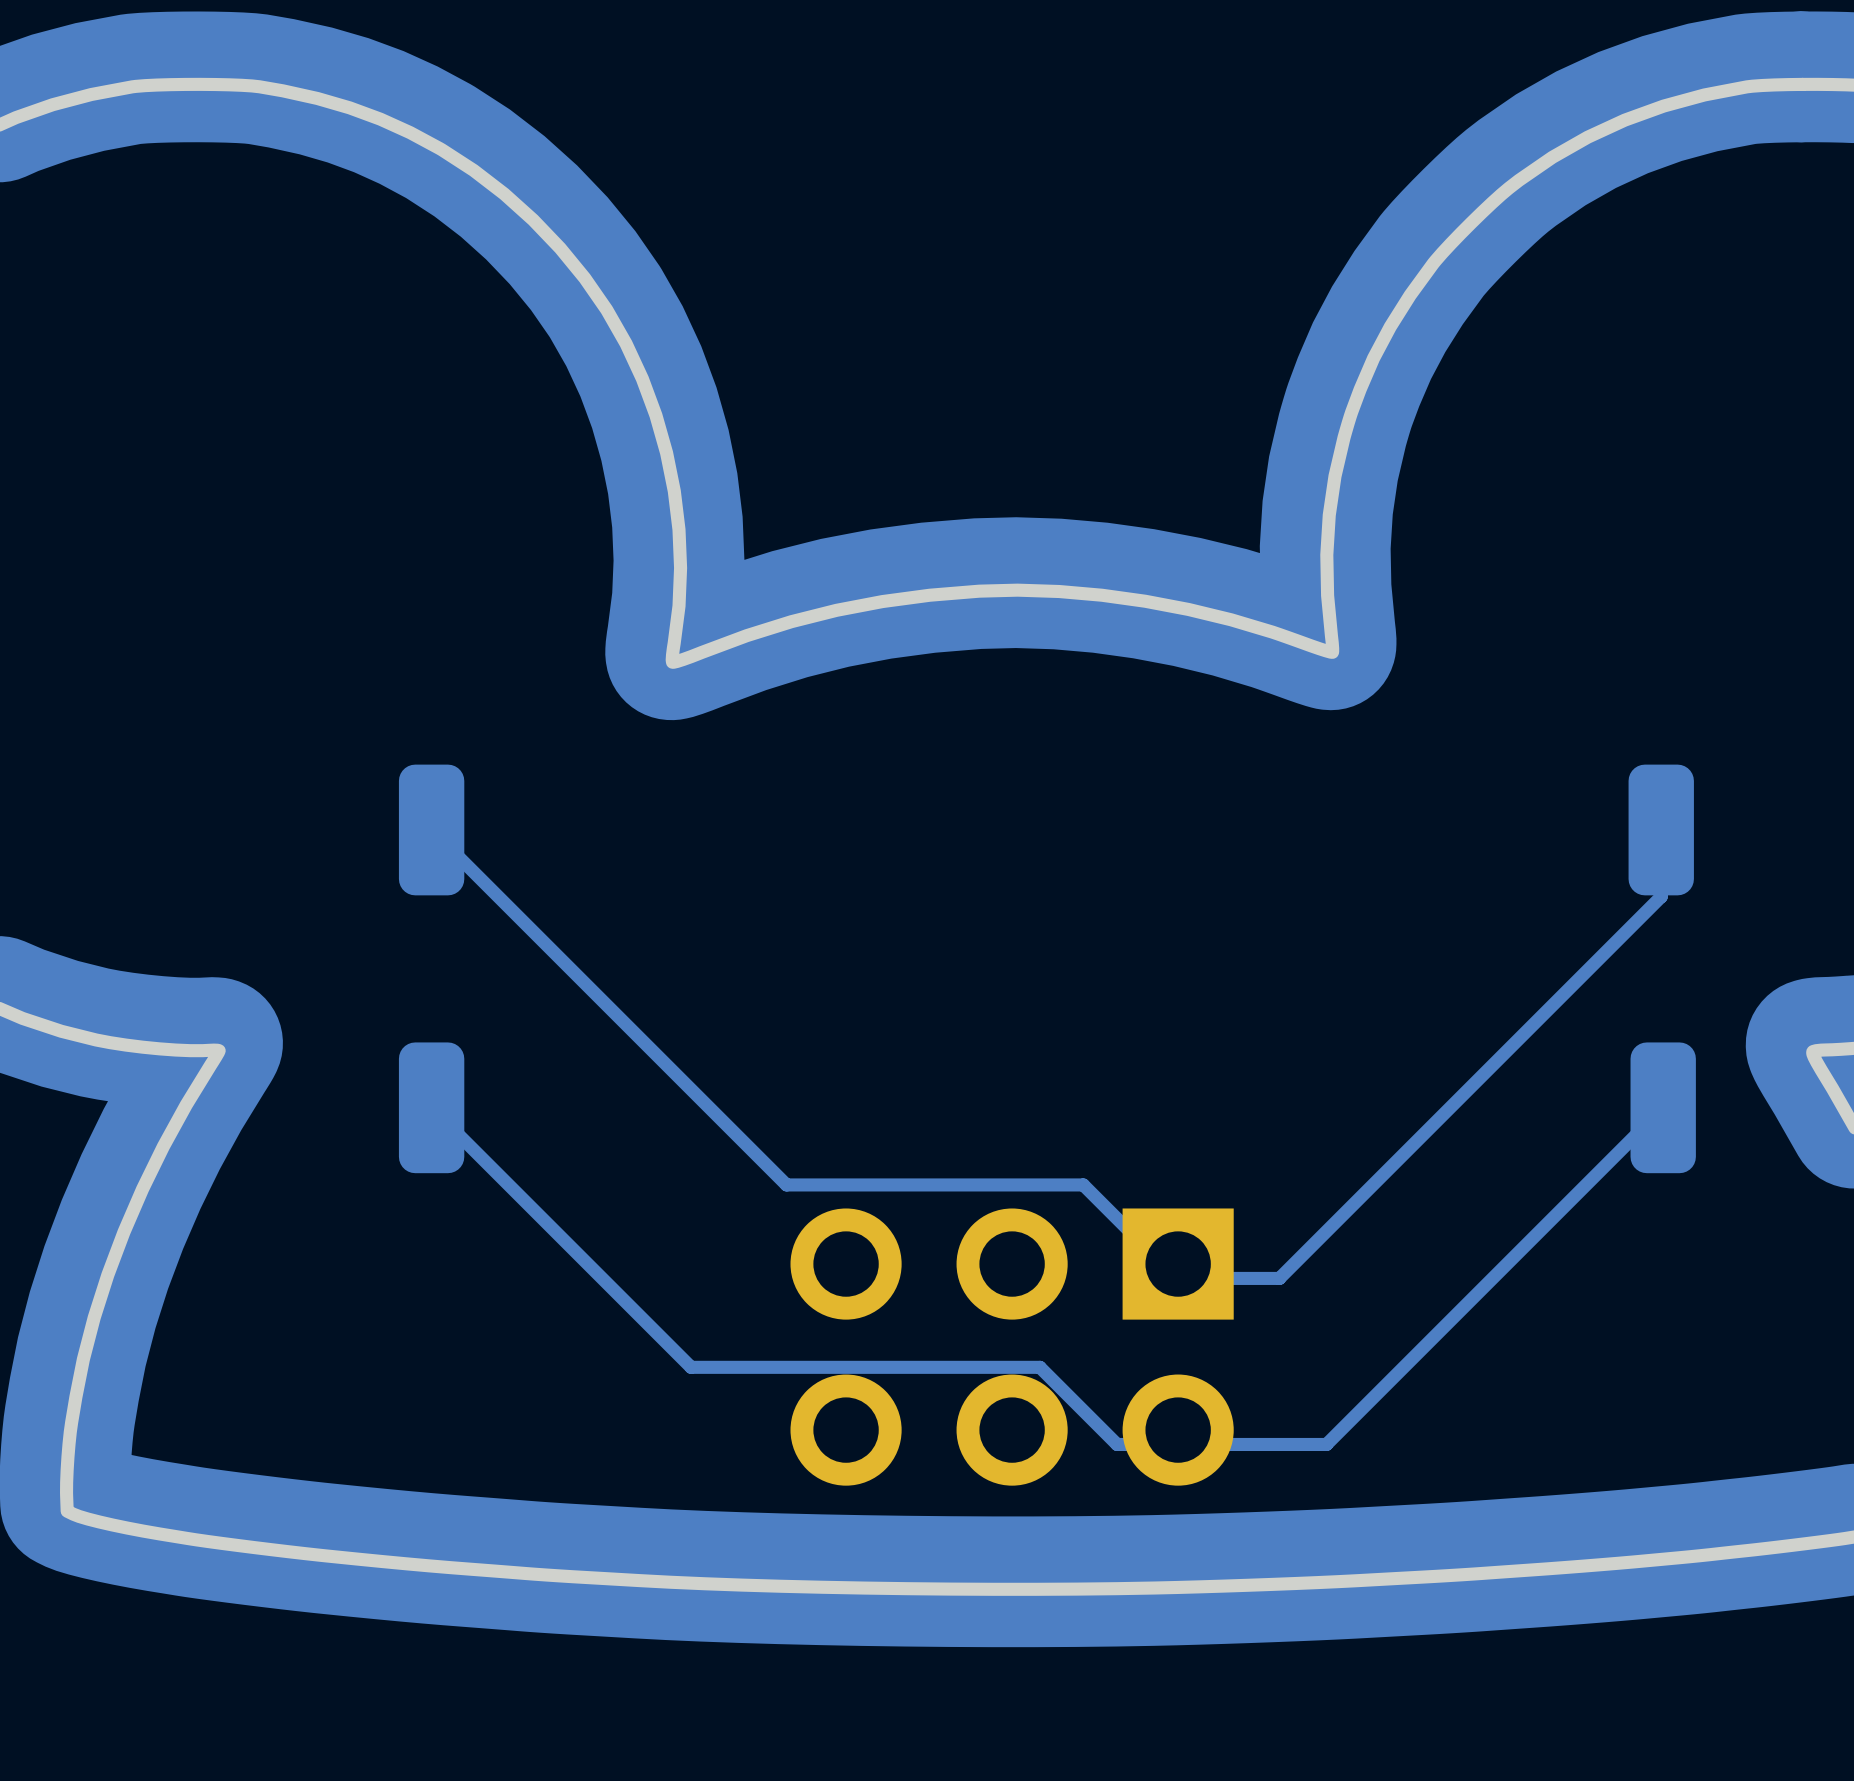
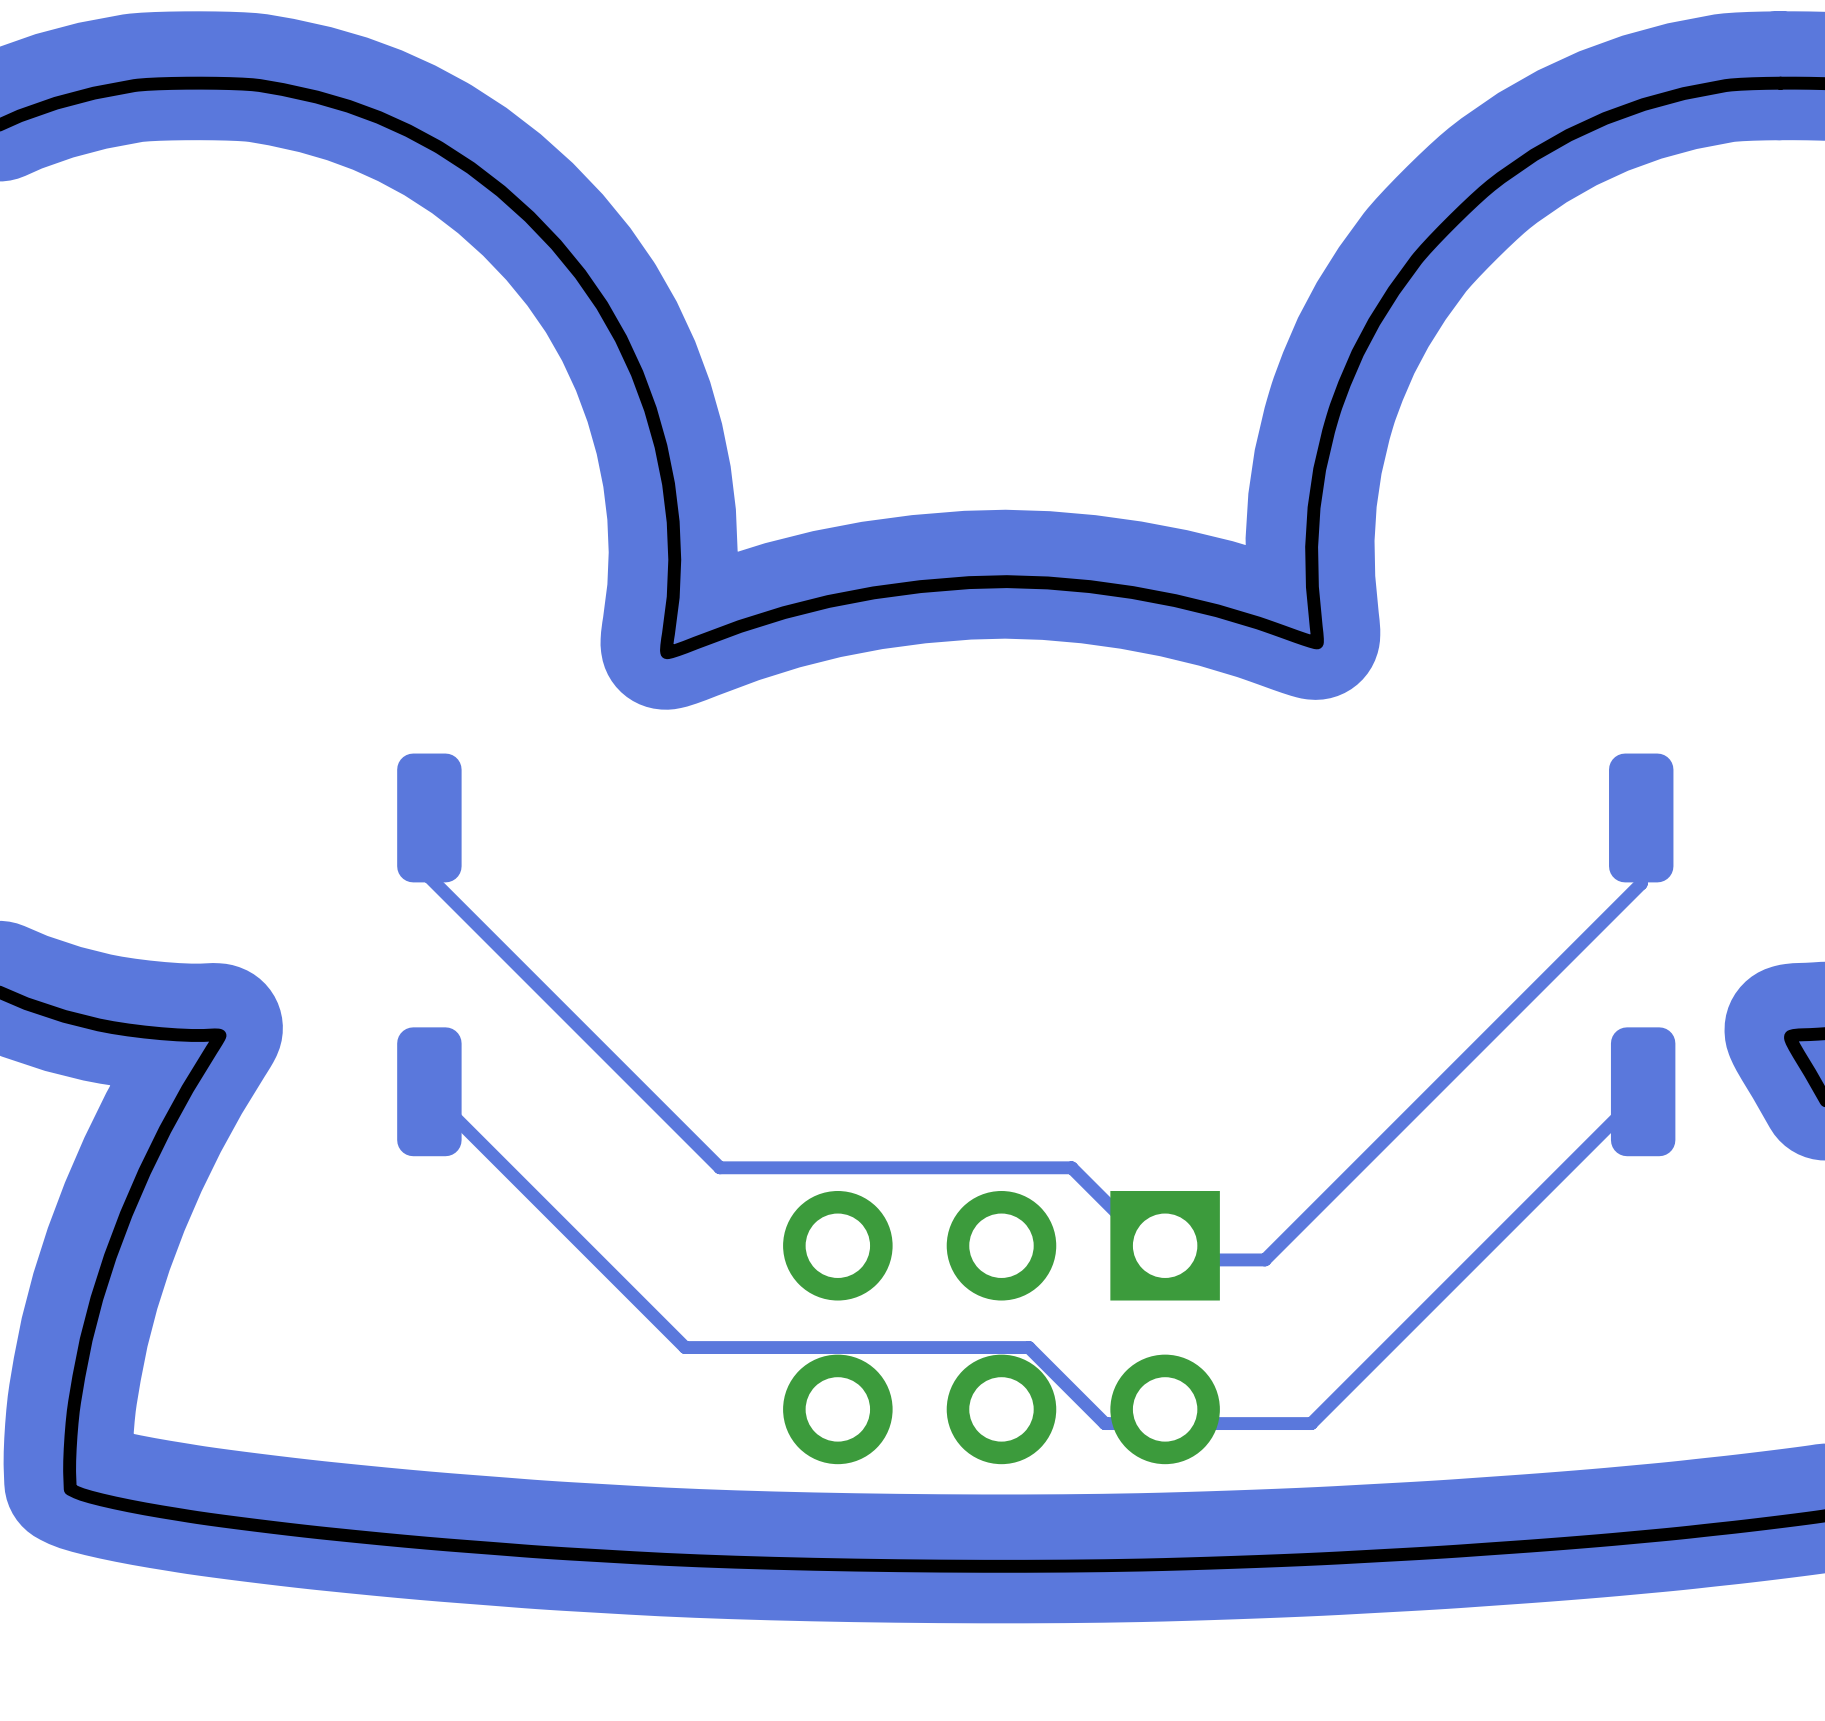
track: (431, 829) (786, 1184) -> (429, 817) (429, 877) (719, 1167) (779, 1167)

